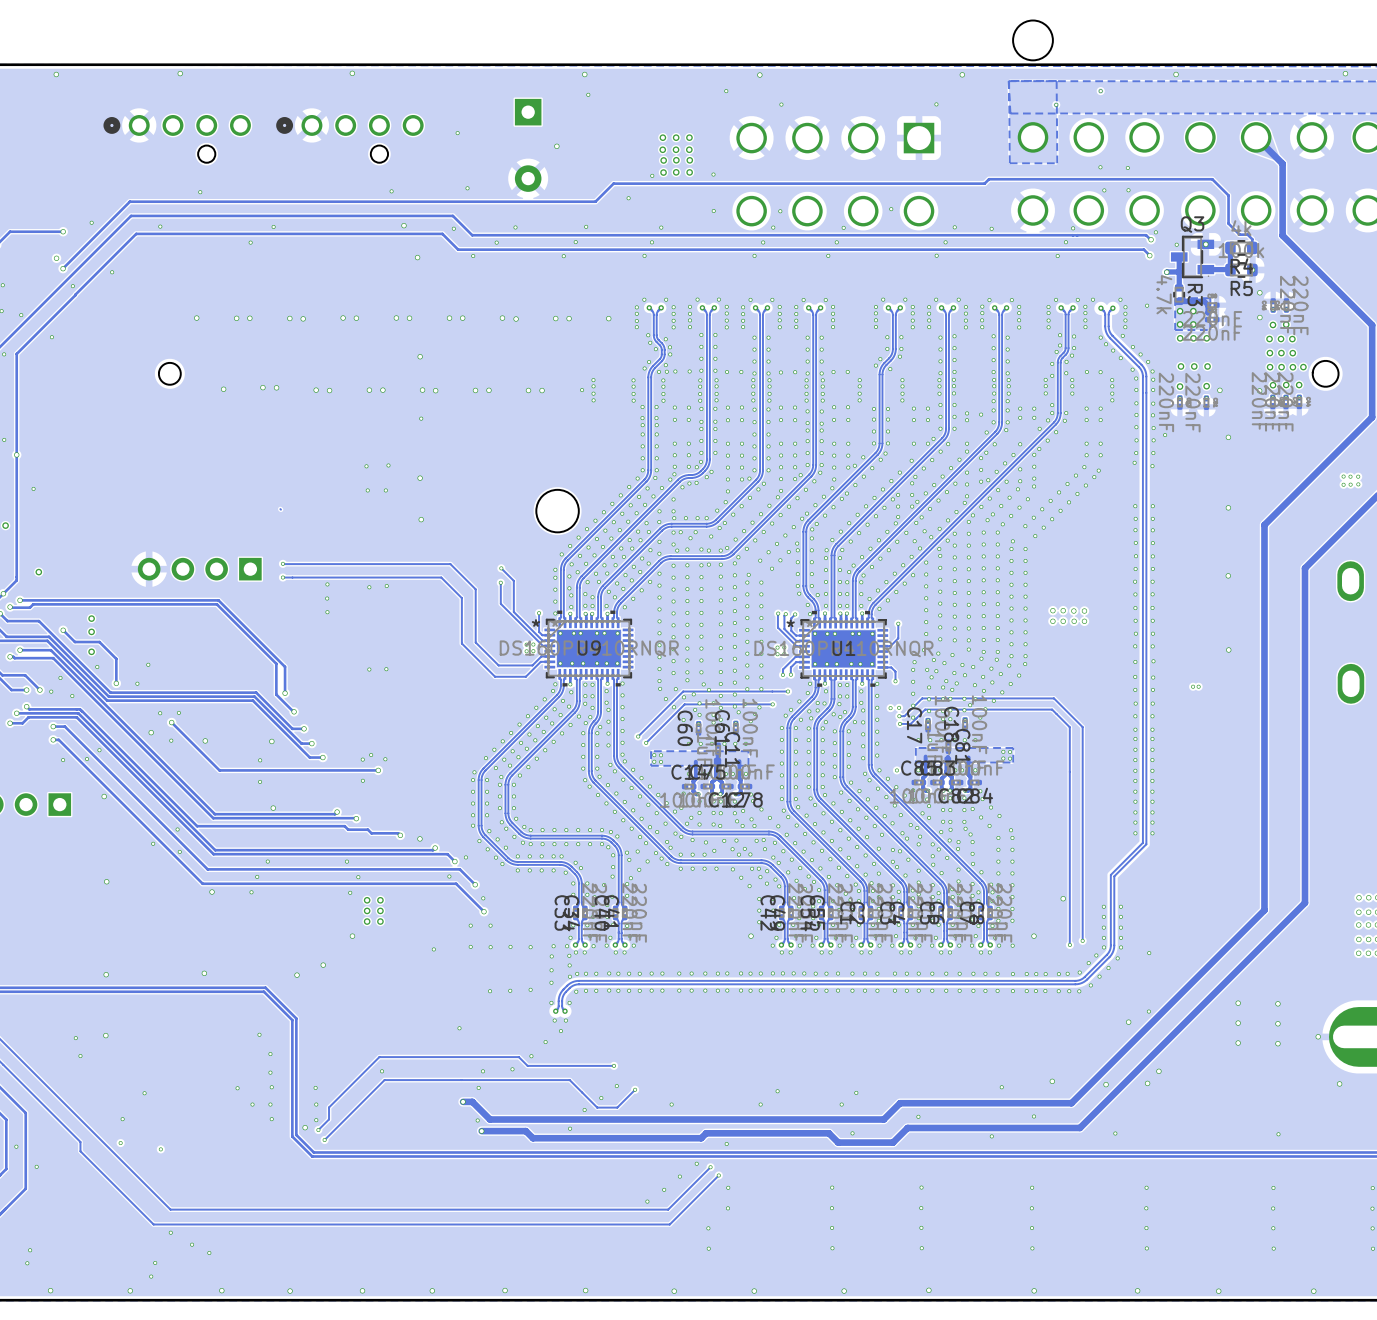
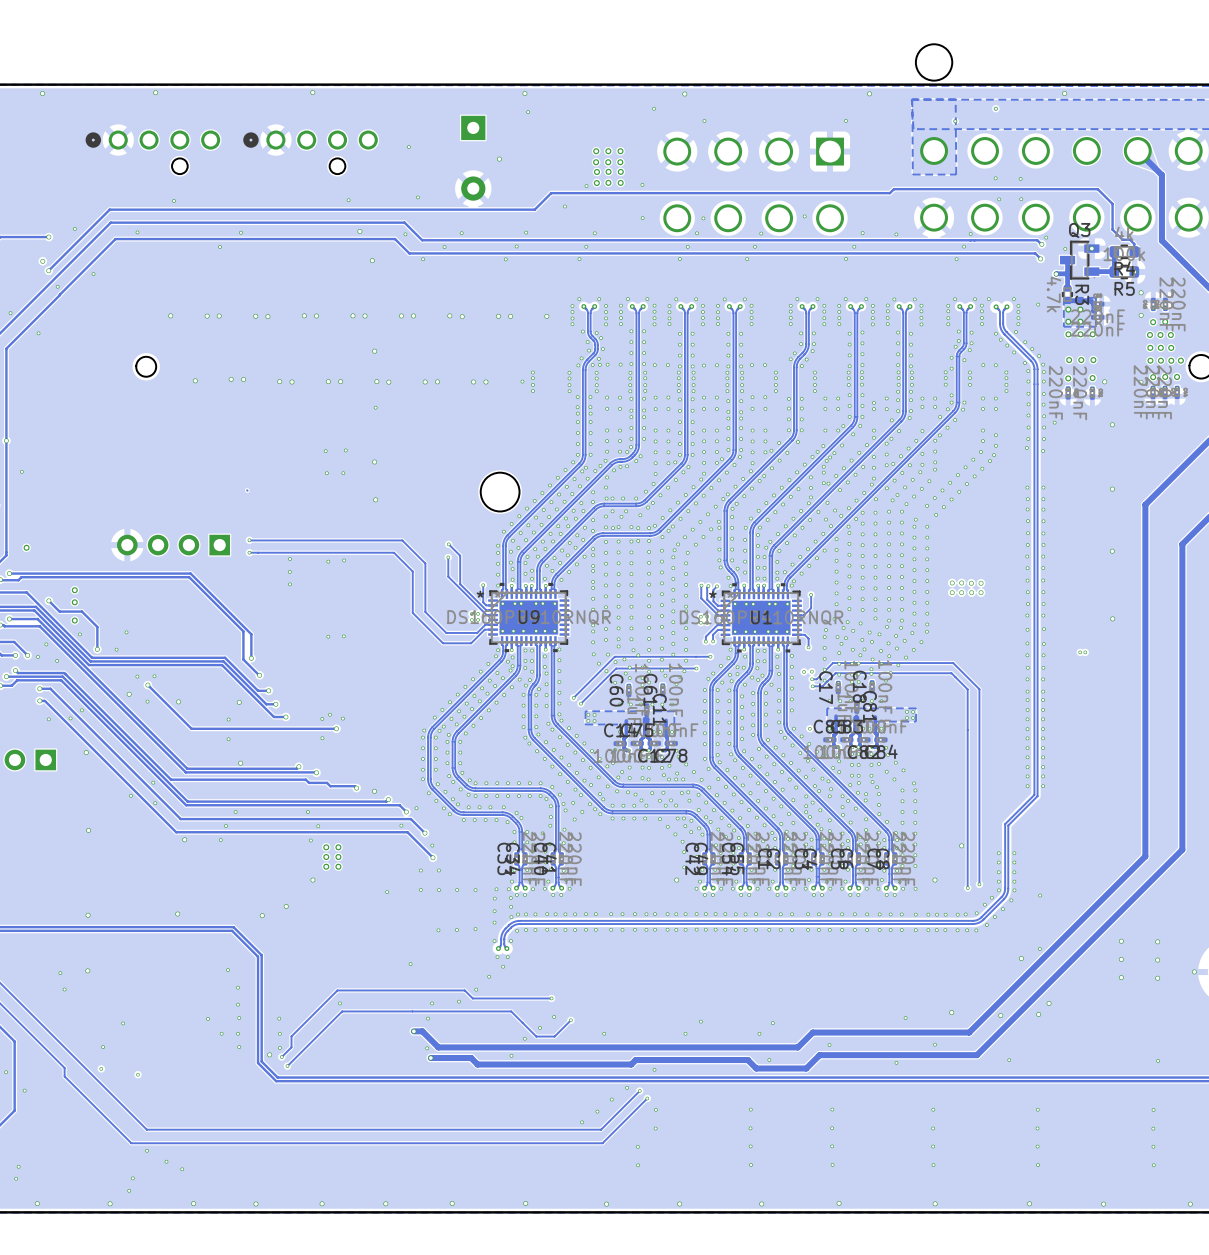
via: none -> (596, 332)
via: (665, 339) -> none
via: (650, 342) -> none
via: none -> (601, 338)
via: none -> (587, 342)
via: (670, 347) -> none
via: (655, 349) -> none
via: none -> (589, 350)
via: (1066, 361) -> none
via: (649, 362) -> none
via: none -> (581, 358)
via: none -> (806, 359)
via: none -> (964, 360)
via: (644, 368) -> none
via: (890, 369) -> none
via: none -> (578, 365)
via: none -> (801, 366)
via: (1066, 373) -> none
via: none -> (886, 398)
via: (981, 414) -> none
via: none -> (886, 409)
via: none -> (860, 425)
via: (1100, 443) -> none
via: (948, 444) -> none
via: none -> (853, 434)
via: none -> (995, 435)
via: (940, 451) -> none
via: (885, 453) -> none
via: (1100, 455) -> none
via: none -> (797, 441)
via: (880, 459) -> none
via: none -> (995, 445)
via: none -> (817, 451)
via: none -> (830, 457)
via: (674, 474) -> none
via: none -> (605, 460)
via: (655, 477) -> none
via: (670, 479) -> none
via: none -> (600, 465)
via: none -> (585, 467)
via: none -> (823, 472)
via: (912, 494) -> none
via: none -> (607, 477)
via: (673, 499) -> none
via: (892, 499) -> none
via: none -> (823, 483)
via: none -> (605, 487)
via: (912, 506) -> none
via: (673, 511) -> none
via: (972, 515) -> none
via: (921, 517) -> none
via: none -> (612, 498)
via: (685, 518) -> none
via: none -> (623, 498)
via: (697, 518) -> none
via: none -> (876, 499)
via: (968, 521) -> none
via: (673, 532) -> none
via: none -> (605, 516)
via: (673, 544) -> none
via: none -> (605, 527)
via: (677, 550) -> none
via: none -> (612, 528)
via: none -> (668, 530)
via: (738, 557) -> none
via: (825, 558) -> none
via: none -> (662, 537)
via: (734, 563) -> none
via: none -> (745, 539)
via: none -> (678, 544)
via: (825, 570) -> none
via: none -> (745, 550)
via: none -> (687, 552)
via: none -> (593, 555)
via: (825, 581) -> none
via: (761, 582) -> none
via: (861, 582) -> none
via: (659, 585) -> none
via: none -> (745, 561)
via: none -> (777, 561)
via: none -> (525, 563)
via: none -> (686, 563)
via: none -> (593, 566)
via: (825, 593) -> none
via: (585, 594) -> none
via: (761, 594) -> none
via: (861, 594) -> none
via: none -> (745, 572)
via: none -> (777, 572)
via: none -> (525, 573)
via: none -> (686, 574)
via: (585, 605) -> none
via: (825, 605) -> none
via: (761, 606) -> none
via: none -> (686, 584)
via: none -> (791, 585)
via: none -> (593, 587)
via: (761, 618) -> none
via: (659, 621) -> none
via: none -> (686, 595)
via: none -> (593, 598)
via: (761, 629) -> none
via: (659, 633) -> none
via: none -> (686, 606)
via: none -> (593, 609)
via: (659, 645) -> none
via: none -> (686, 628)
via: none -> (593, 631)
via: (761, 665) -> none
via: (659, 669) -> none
via: none -> (686, 639)
via: none -> (593, 642)
via: (761, 677) -> none
via: (659, 681) -> none
via: (946, 681) -> none
via: none -> (686, 649)
via: (877, 683) -> none
via: none -> (852, 649)
via: (943, 687) -> none
via: (761, 689) -> none
via: none -> (791, 655)
via: none -> (872, 659)
via: none -> (686, 660)
via: (877, 695) -> none
via: none -> (507, 661)
via: (964, 698) -> none
via: (563, 700) -> none
via: none -> (512, 666)
via: none -> (791, 666)
via: none -> (871, 669)
via: (970, 705) -> none
via: (877, 707) -> none
via: none -> (791, 677)
via: (877, 719) -> none
via: (863, 722) -> none
via: none -> (791, 688)
via: none -> (779, 689)
via: (822, 728) -> none
via: (877, 731) -> none
via: none -> (742, 696)
via: (863, 734) -> none
via: none -> (791, 699)
via: none -> (779, 700)
via: (822, 740) -> none
via: (877, 743) -> none
via: none -> (742, 707)
via: (863, 746) -> none
via: none -> (791, 710)
via: (822, 751) -> none
via: none -> (779, 711)
via: (877, 755) -> none
via: none -> (742, 717)
via: (863, 758) -> none
via: (822, 763) -> none
via: none -> (779, 722)
via: none -> (742, 728)
via: none -> (439, 730)
via: (822, 775) -> none
via: none -> (742, 739)
via: (822, 786) -> none
via: (781, 799) -> none
via: none -> (704, 758)
via: (783, 810) -> none
via: none -> (708, 769)
via: (788, 817) -> none
via: none -> (676, 779)
via: (754, 825) -> none
via: none -> (683, 779)
via: (610, 832) -> none
via: none -> (552, 787)
via: (617, 836) -> none
via: (681, 836) -> none
via: none -> (617, 791)
via: (692, 840) -> none
via: none -> (628, 792)
via: none -> (559, 794)
via: none -> (806, 796)
via: none -> (641, 800)
via: (714, 850) -> none
via: (892, 850) -> none
via: none -> (457, 804)
via: none -> (646, 805)
via: none -> (806, 806)
via: (517, 856) -> none
via: none -> (468, 807)
via: (529, 856) -> none
via: none -> (479, 807)
via: (541, 856) -> none
via: none -> (490, 807)
via: (553, 856) -> none
via: (773, 857) -> none
via: none -> (698, 810)
via: (778, 862) -> none
via: none -> (706, 817)
via: (630, 878) -> none
via: none -> (564, 829)
via: none -> (821, 829)
via: (627, 884) -> none
via: none -> (682, 841)
via: (759, 899) -> none
via: none -> (684, 852)
via: (759, 910) -> none

